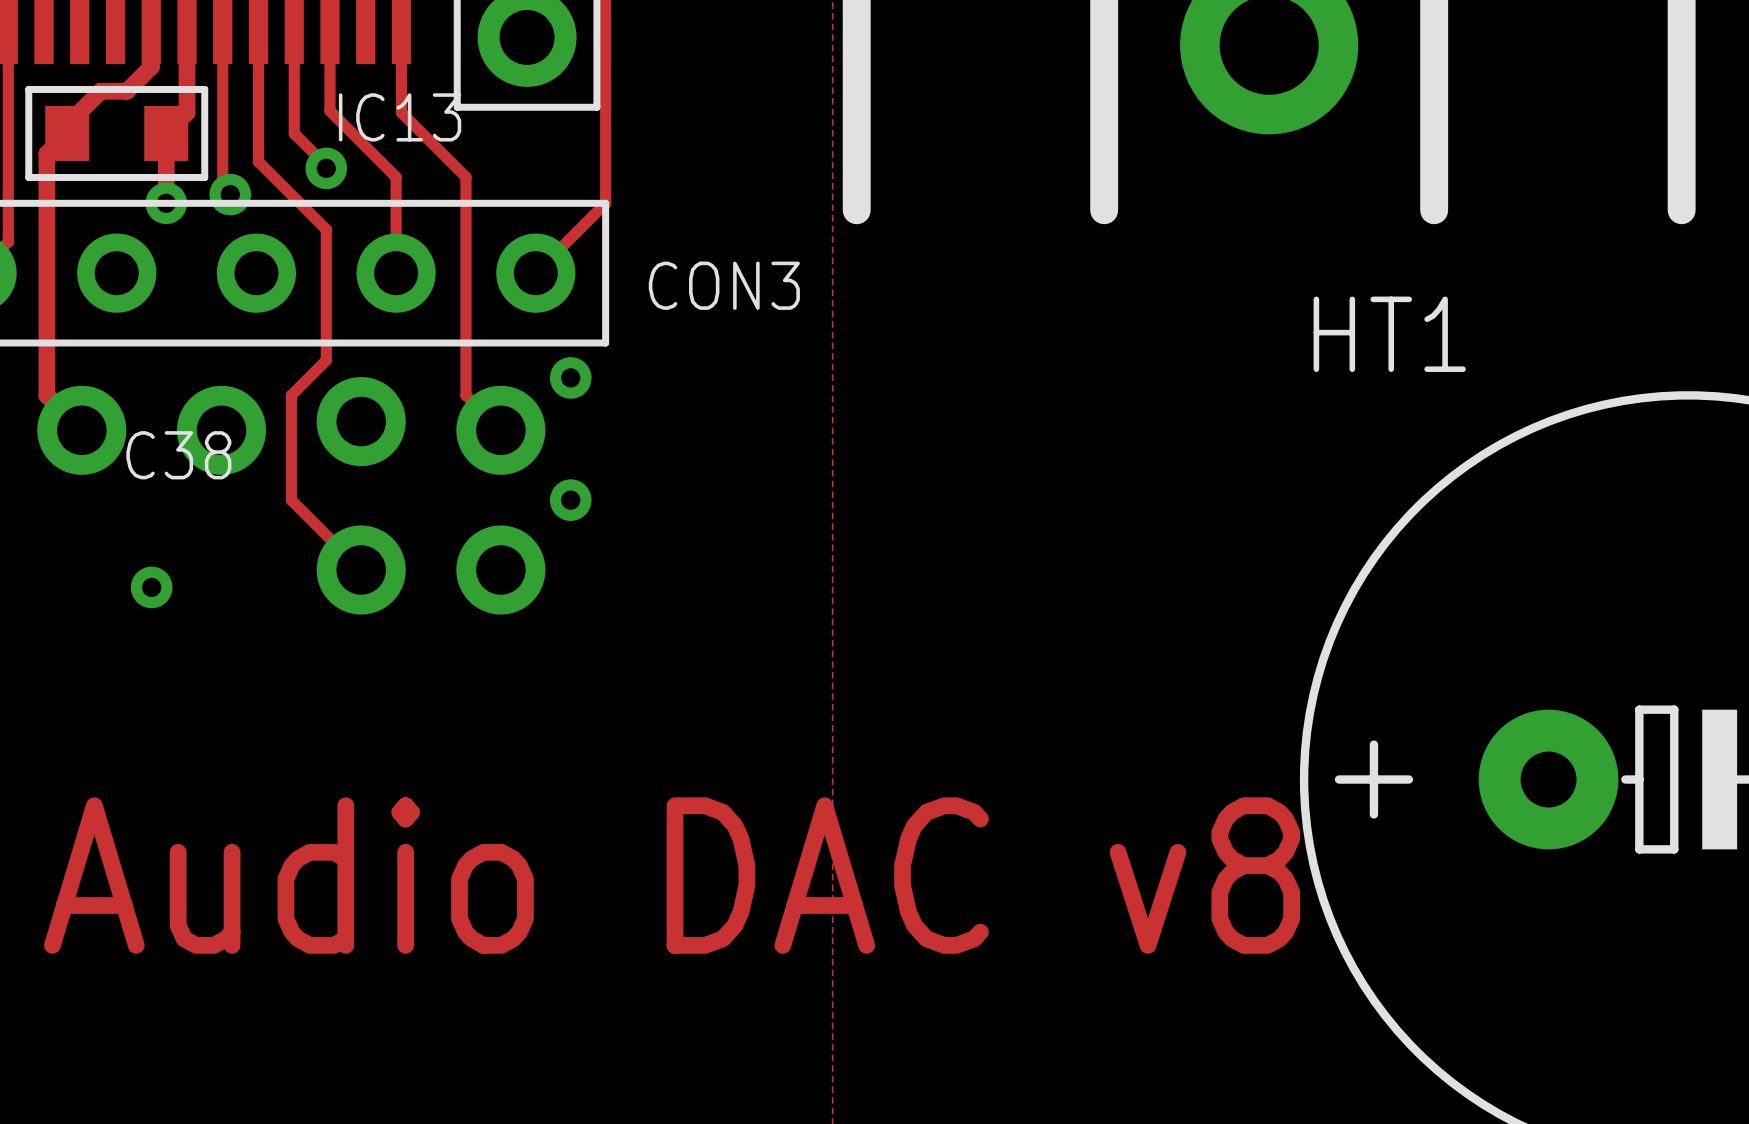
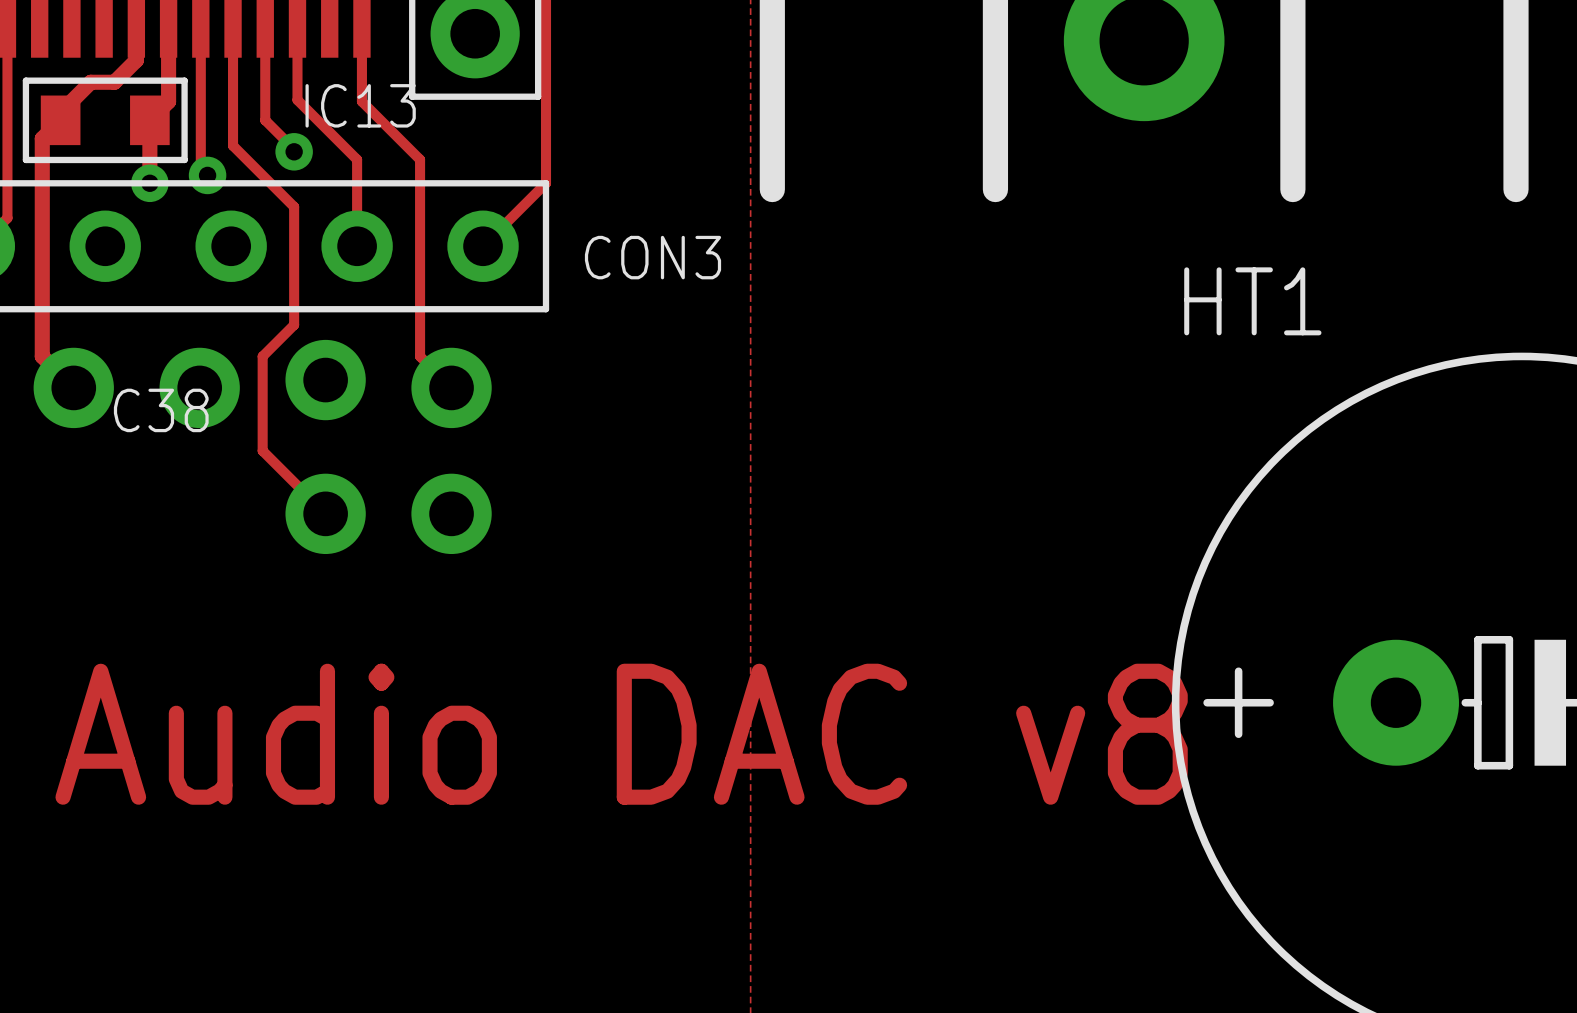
via: (570, 377) -> none
via: (570, 500) -> none
via: (151, 587) -> none
text position: Audio DAC v8 (672, 875) -> Audio DAC v8 (621, 734)

